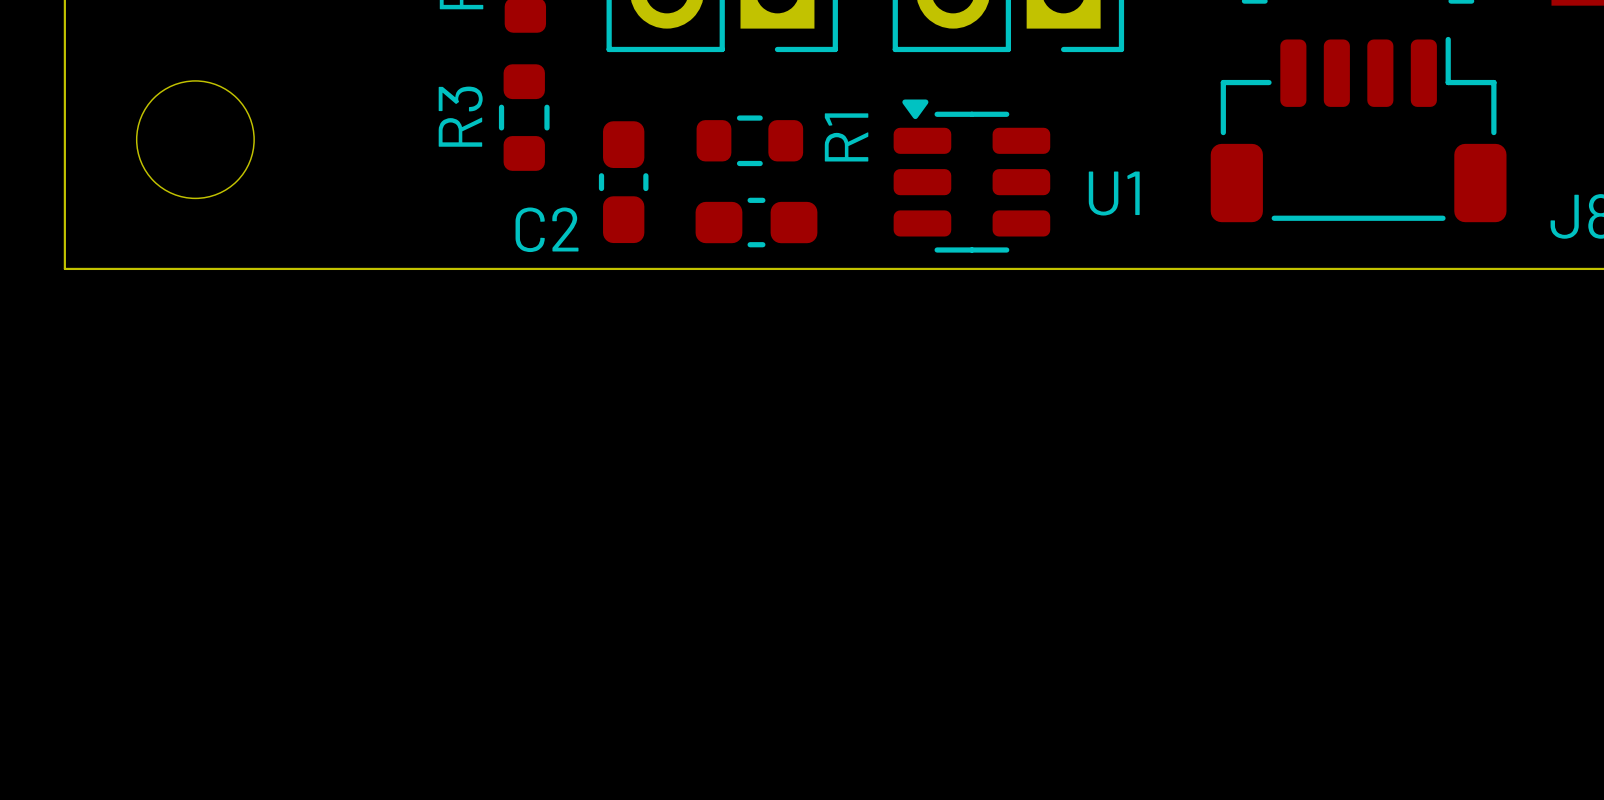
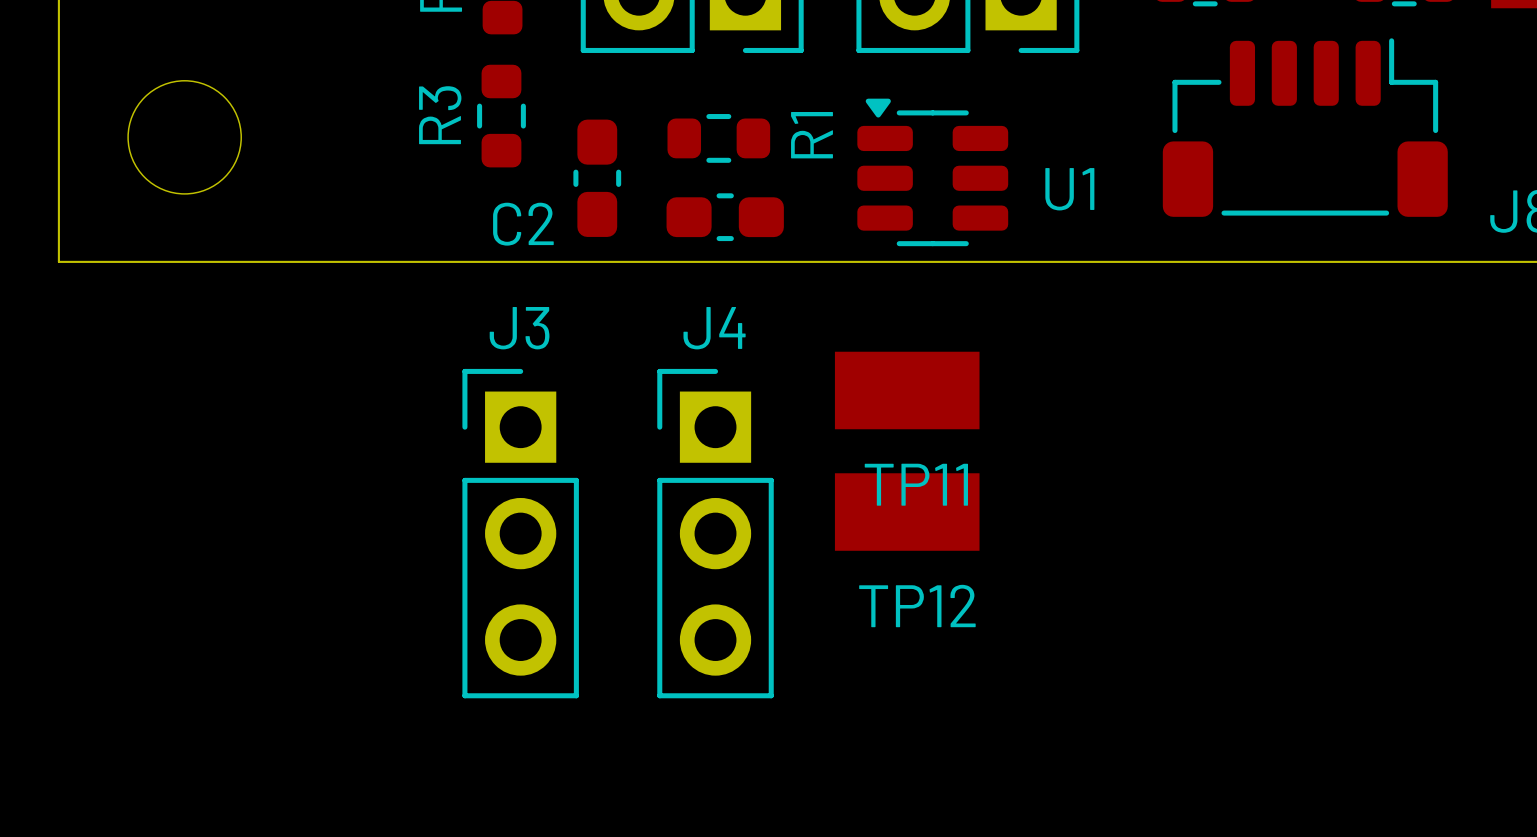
TP11: none -> (907, 390)
TP12: none -> (907, 512)
J3: none -> (520, 533)
J4: none -> (715, 533)

